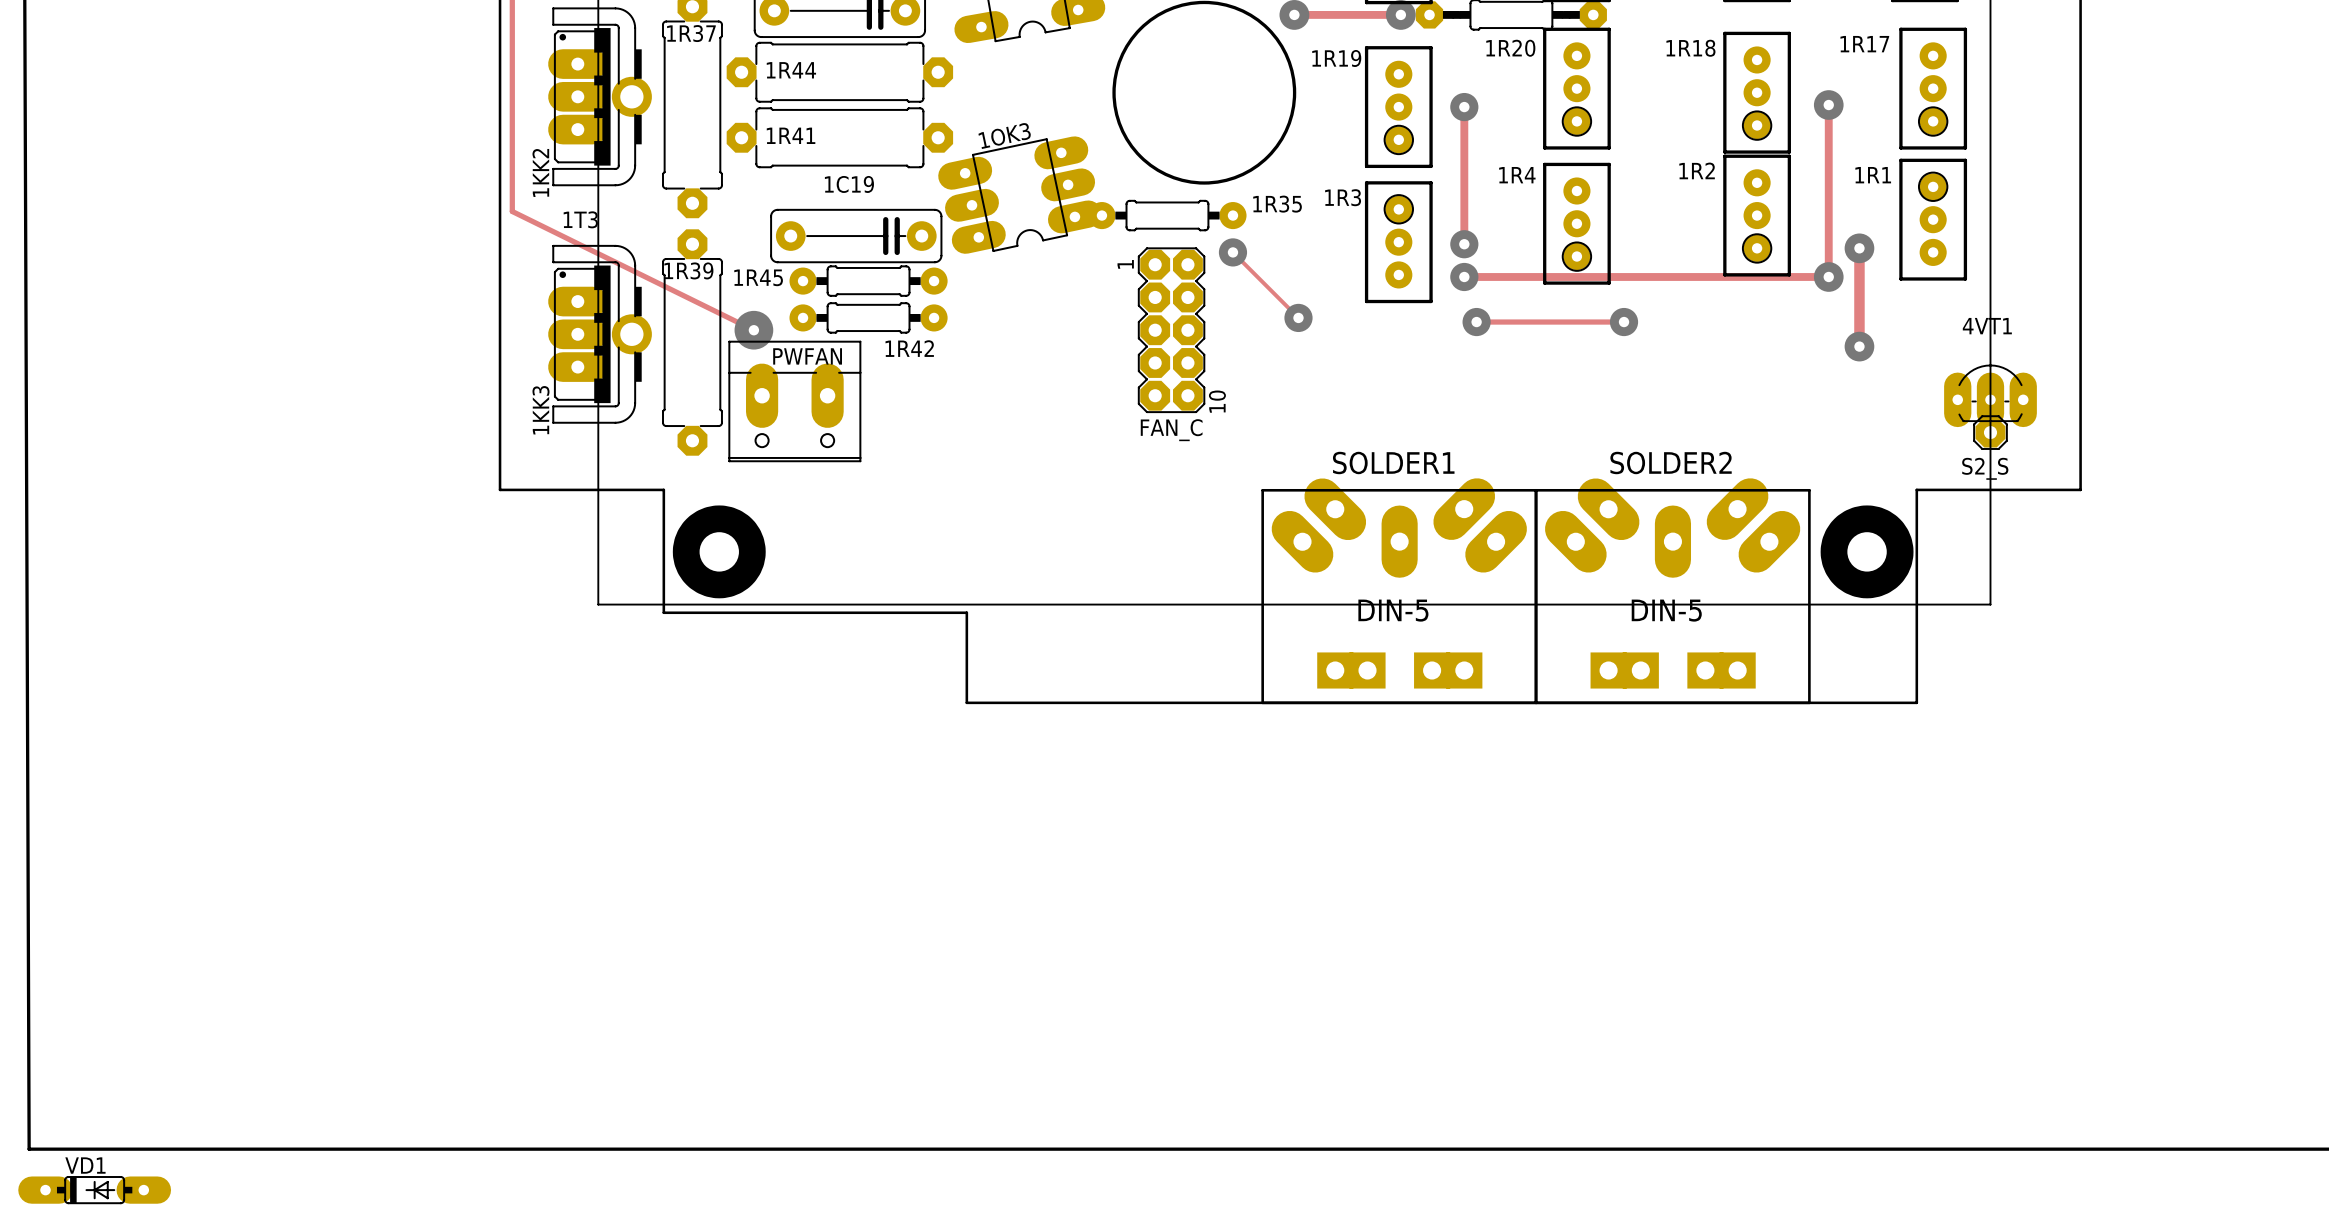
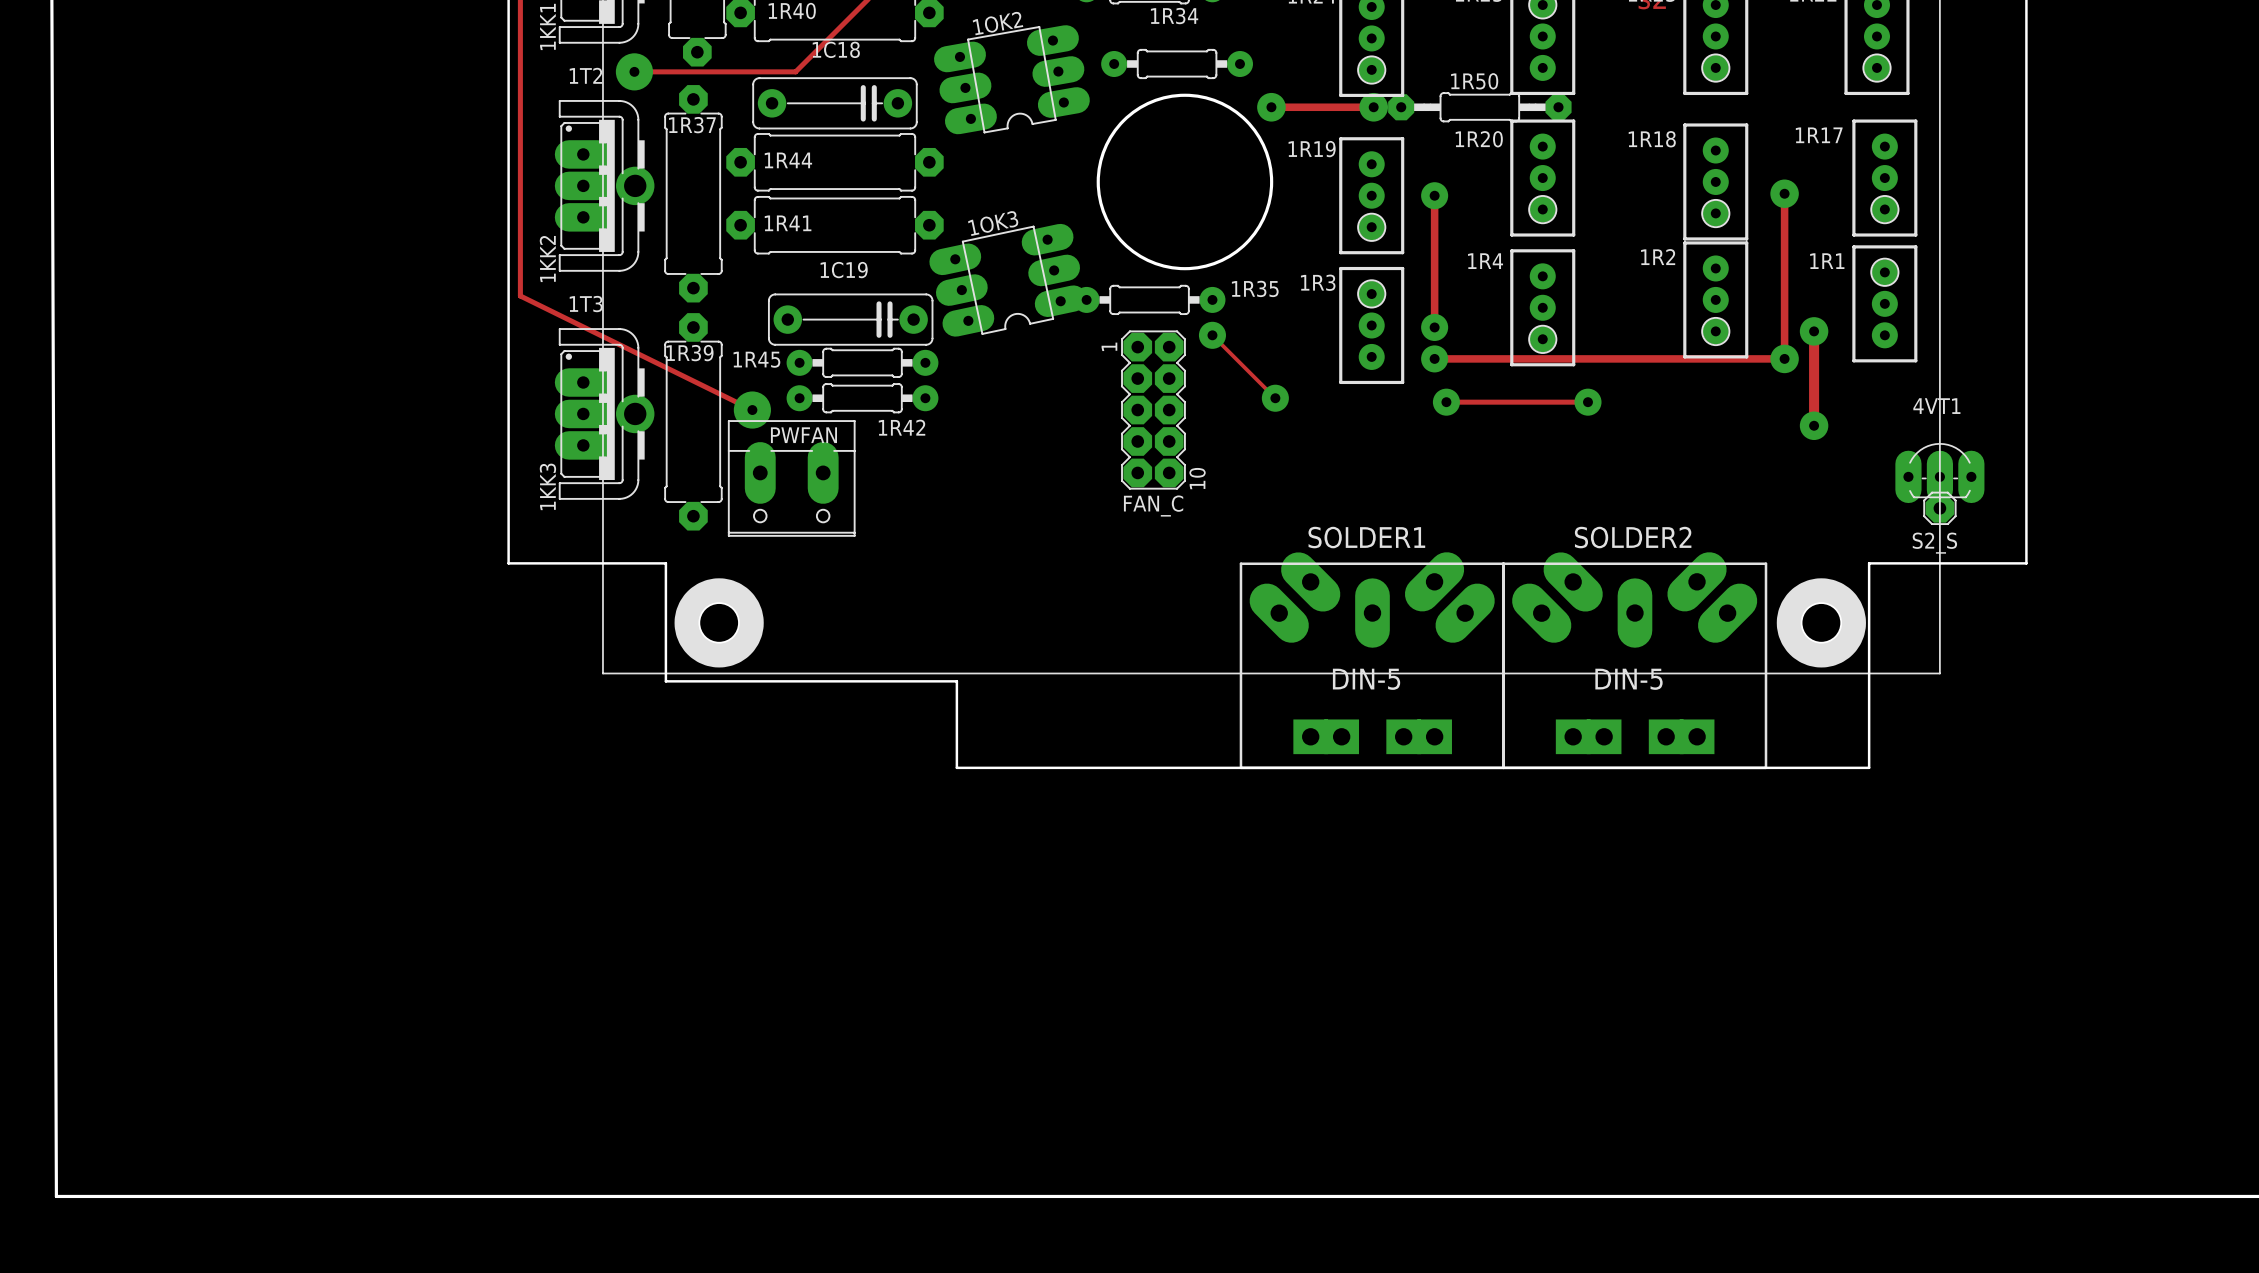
VD1: (94, 1190) -> none

